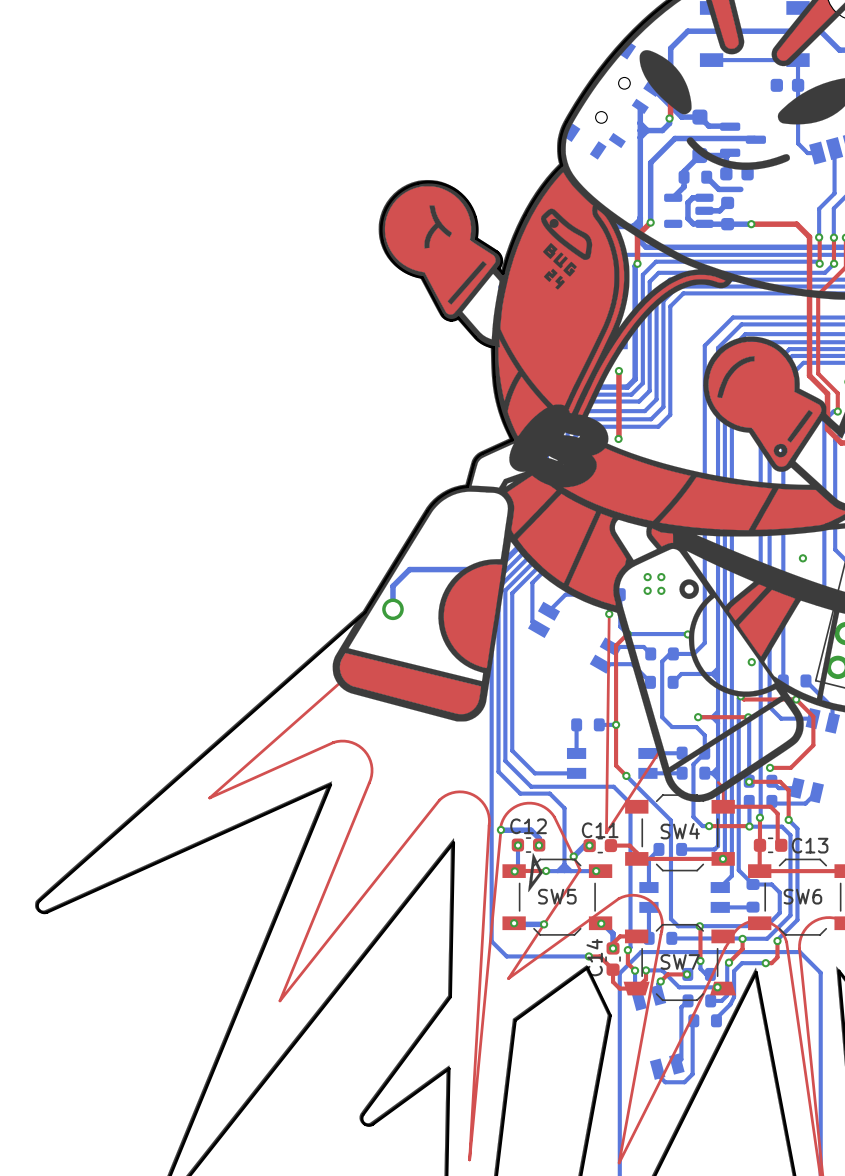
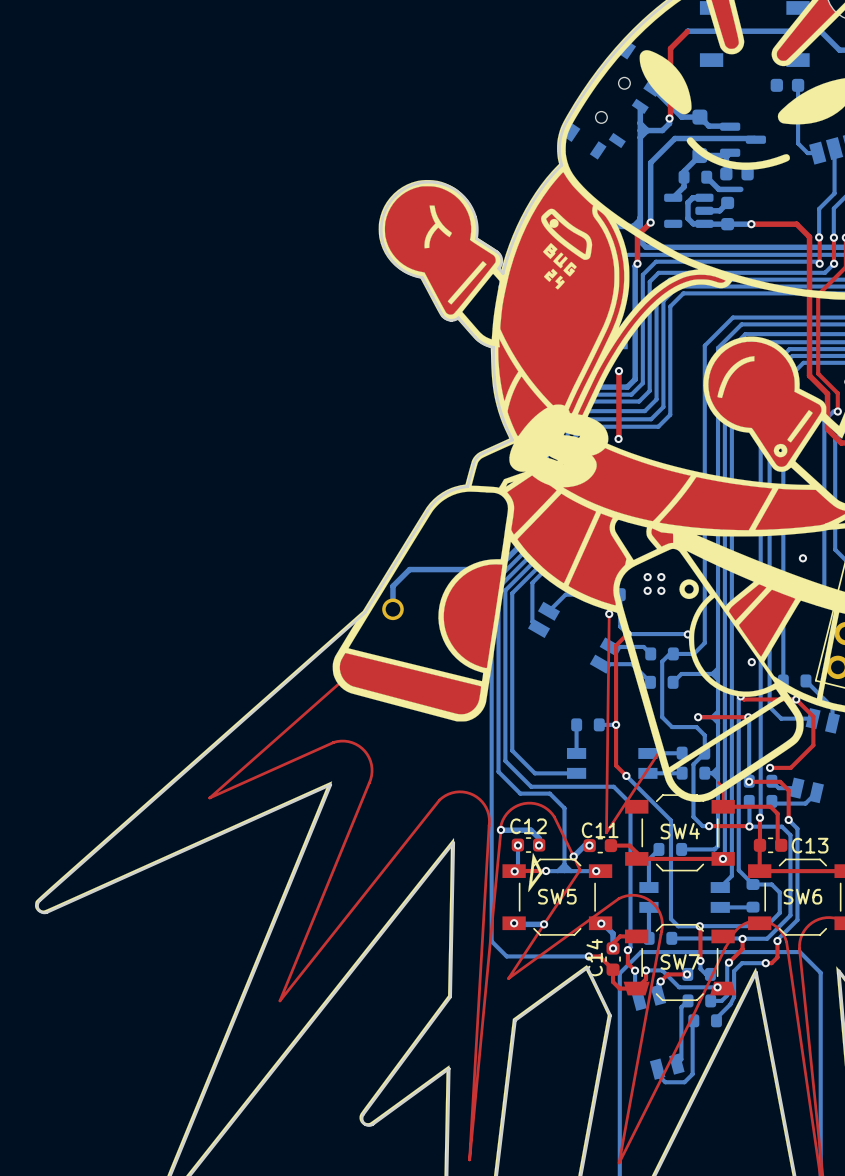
top track: none -> (687, 31) (670, 48) (670, 81)
bottom track: (687, 31) (670, 48) (670, 81) -> none
bottom track: (711, 60) (798, 60) (798, 85) -> none

